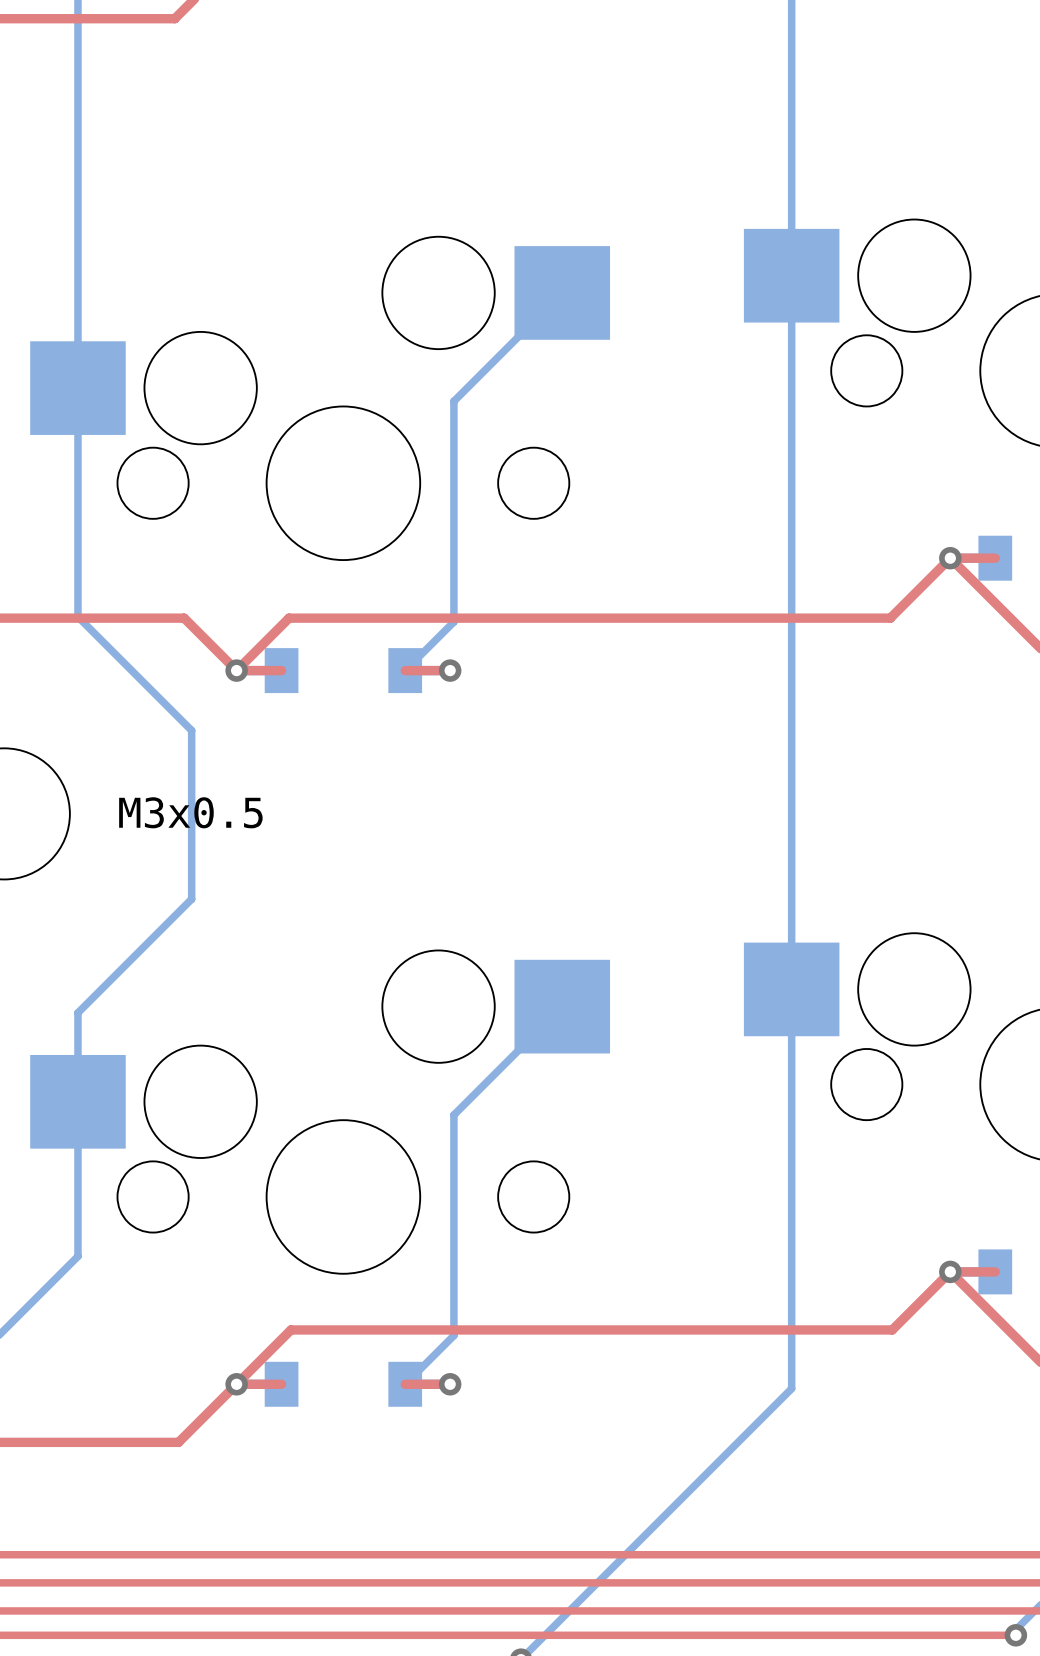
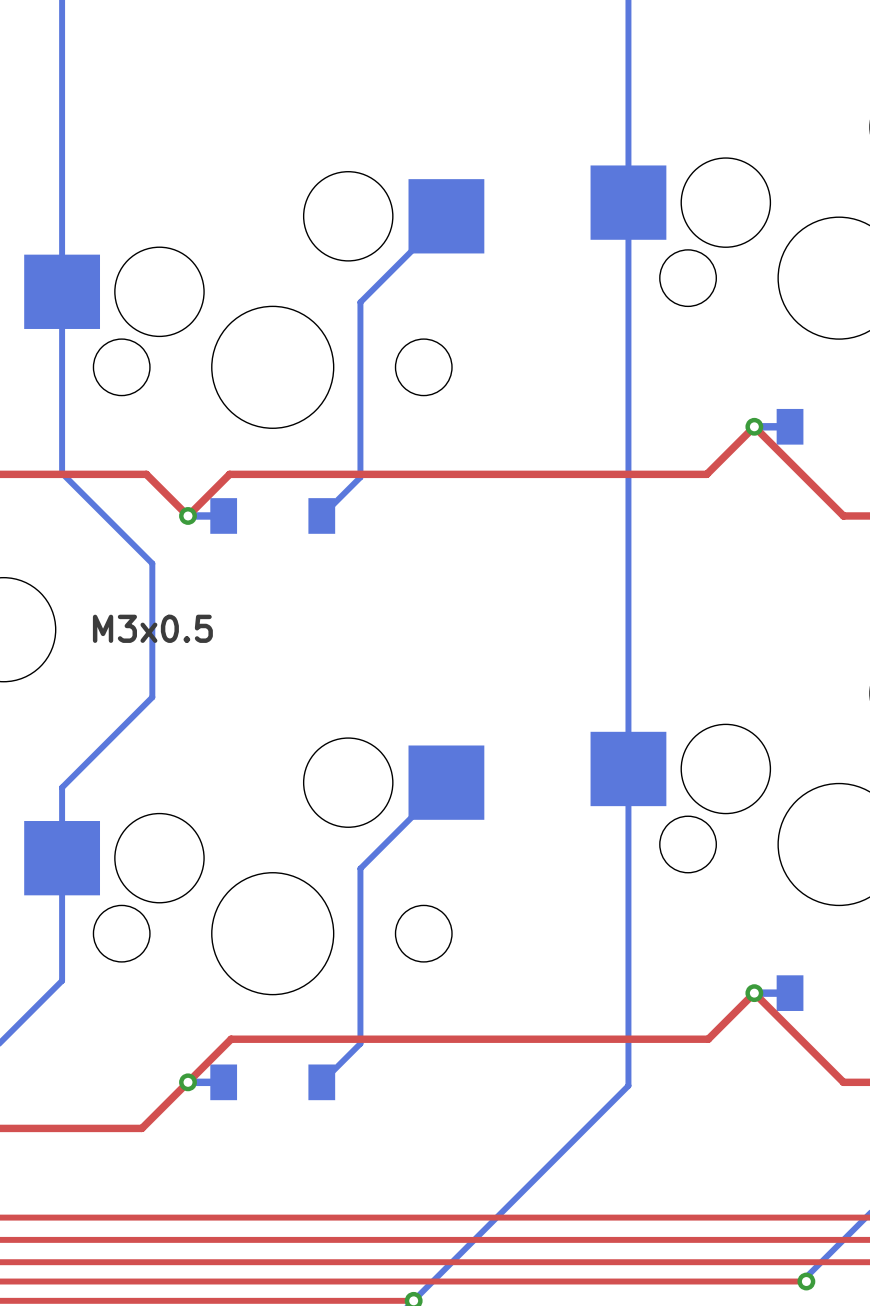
top track: (950, 558) (995, 558) -> none
top track: (236, 670) (281, 670) -> none
top track: (405, 670) (450, 670) -> none
via: (450, 670) -> none
top track: (950, 1271) (995, 1271) -> none
top track: (236, 1384) (281, 1384) -> none
top track: (405, 1384) (450, 1384) -> none
via: (450, 1384) -> none

